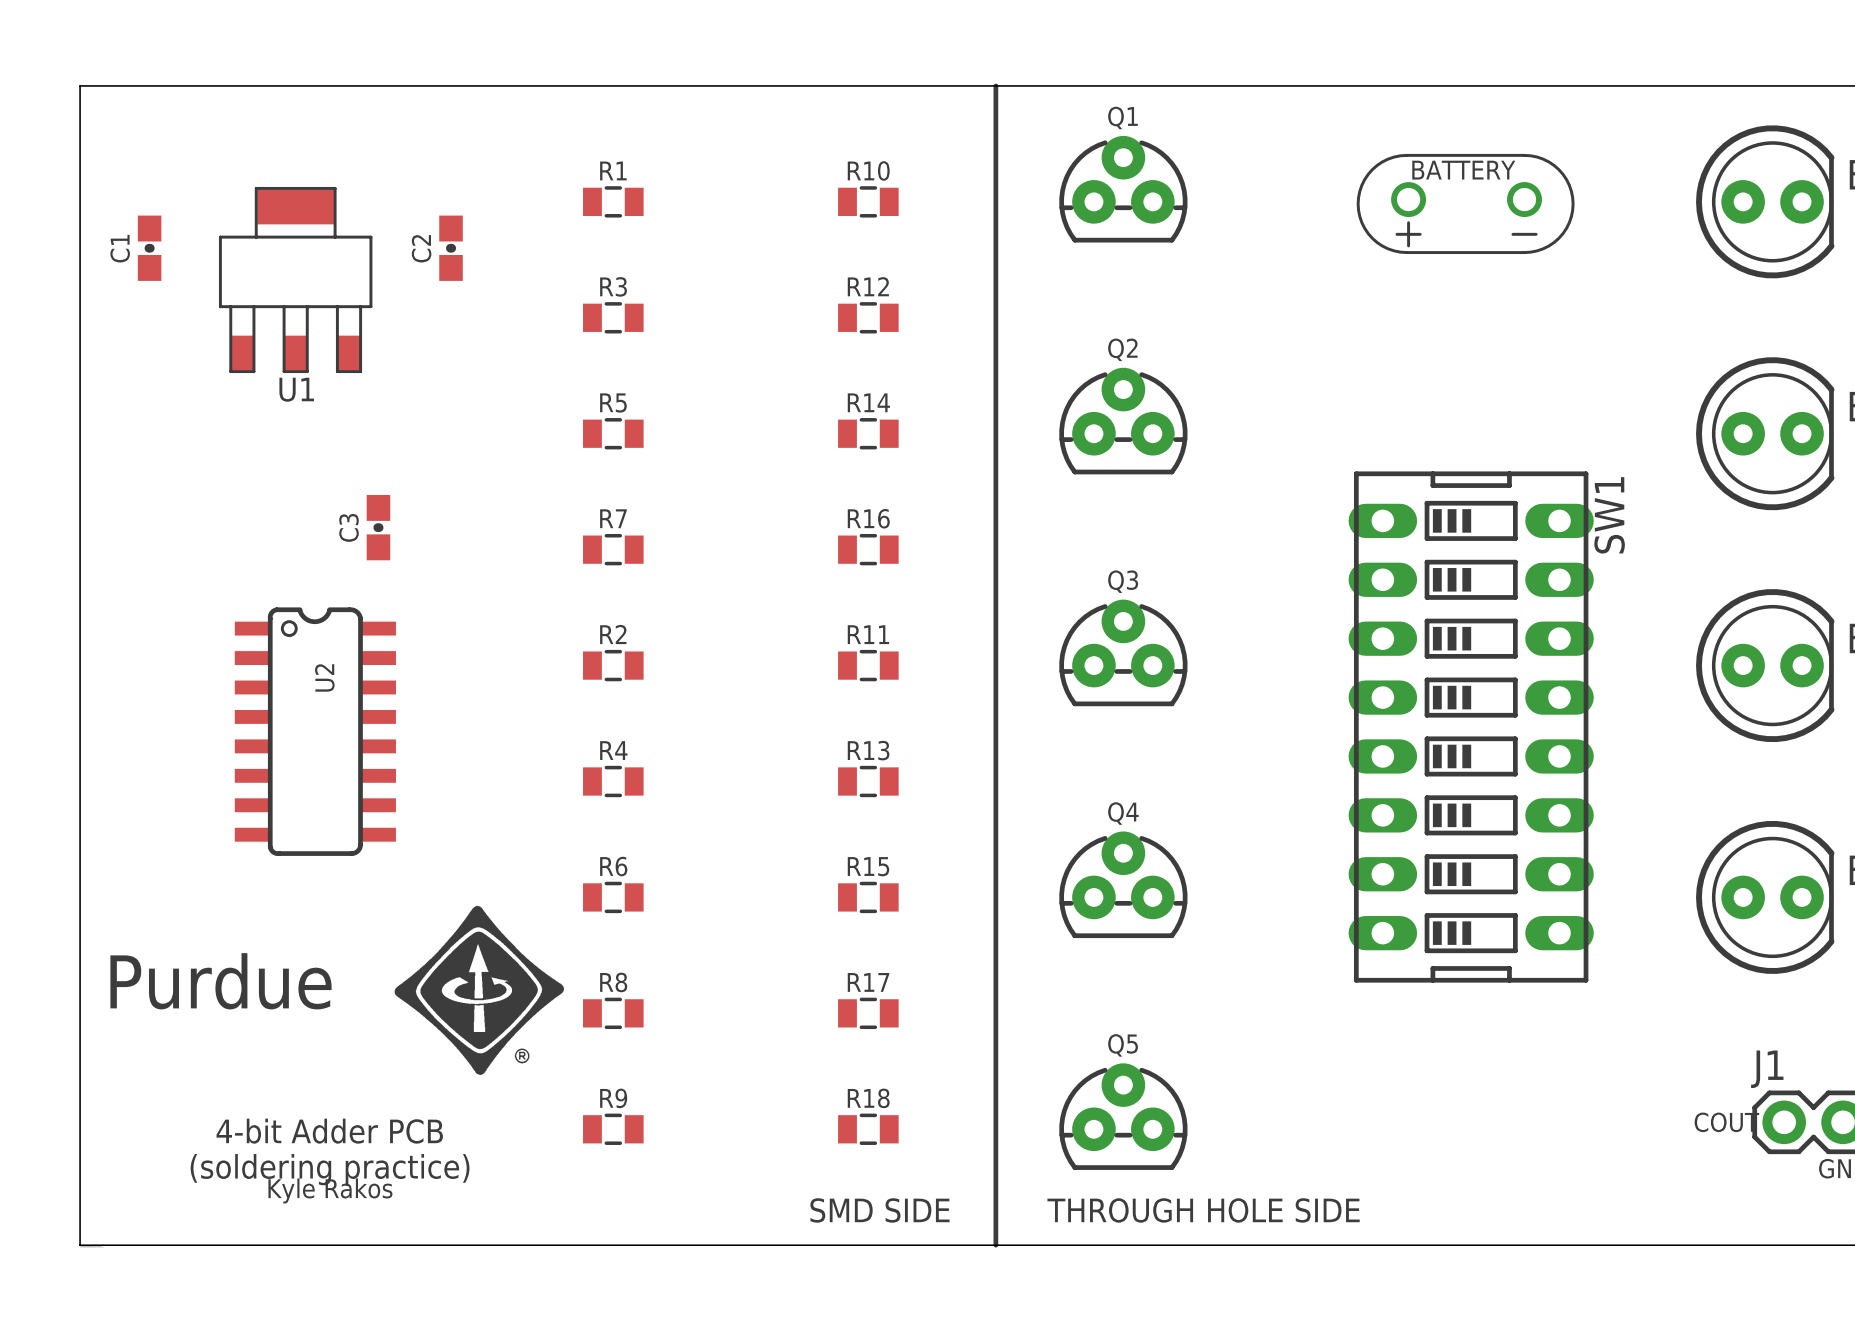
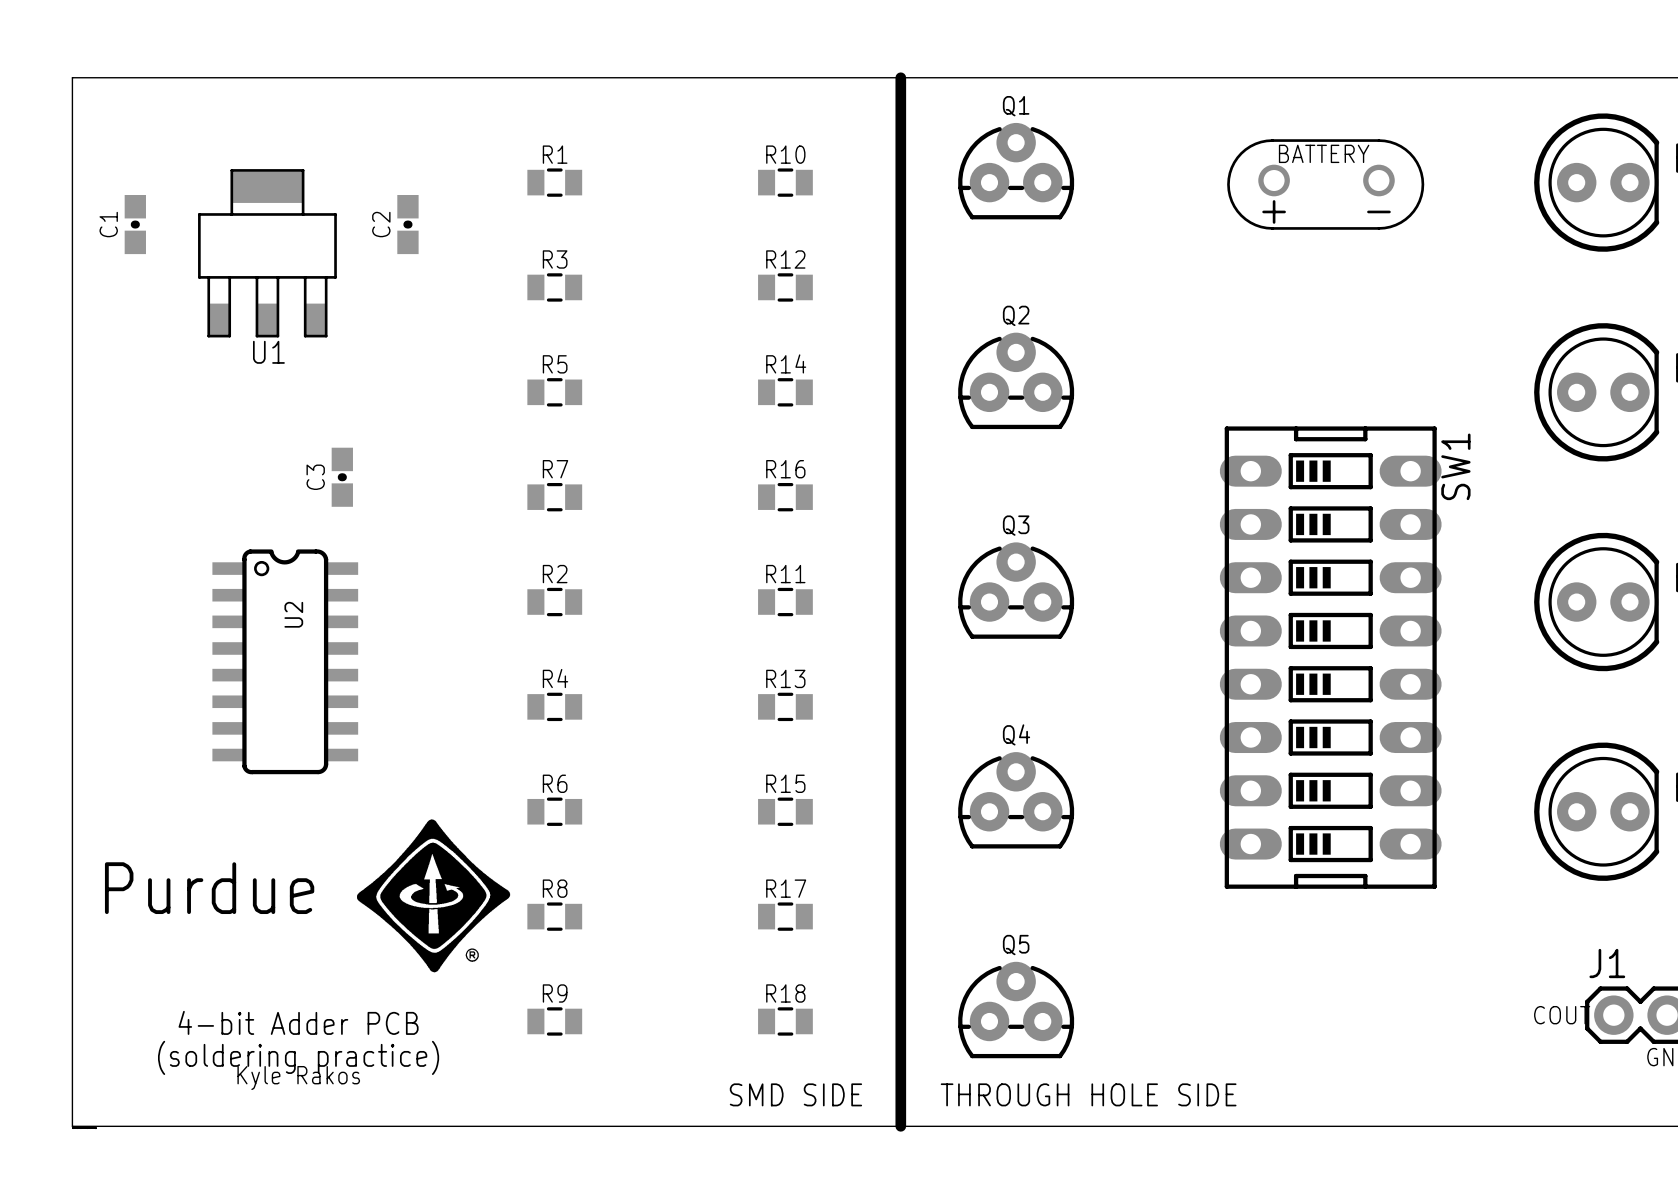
line width: thin (995, 85) (995, 1245) -> thick (900, 77) (900, 1126)

